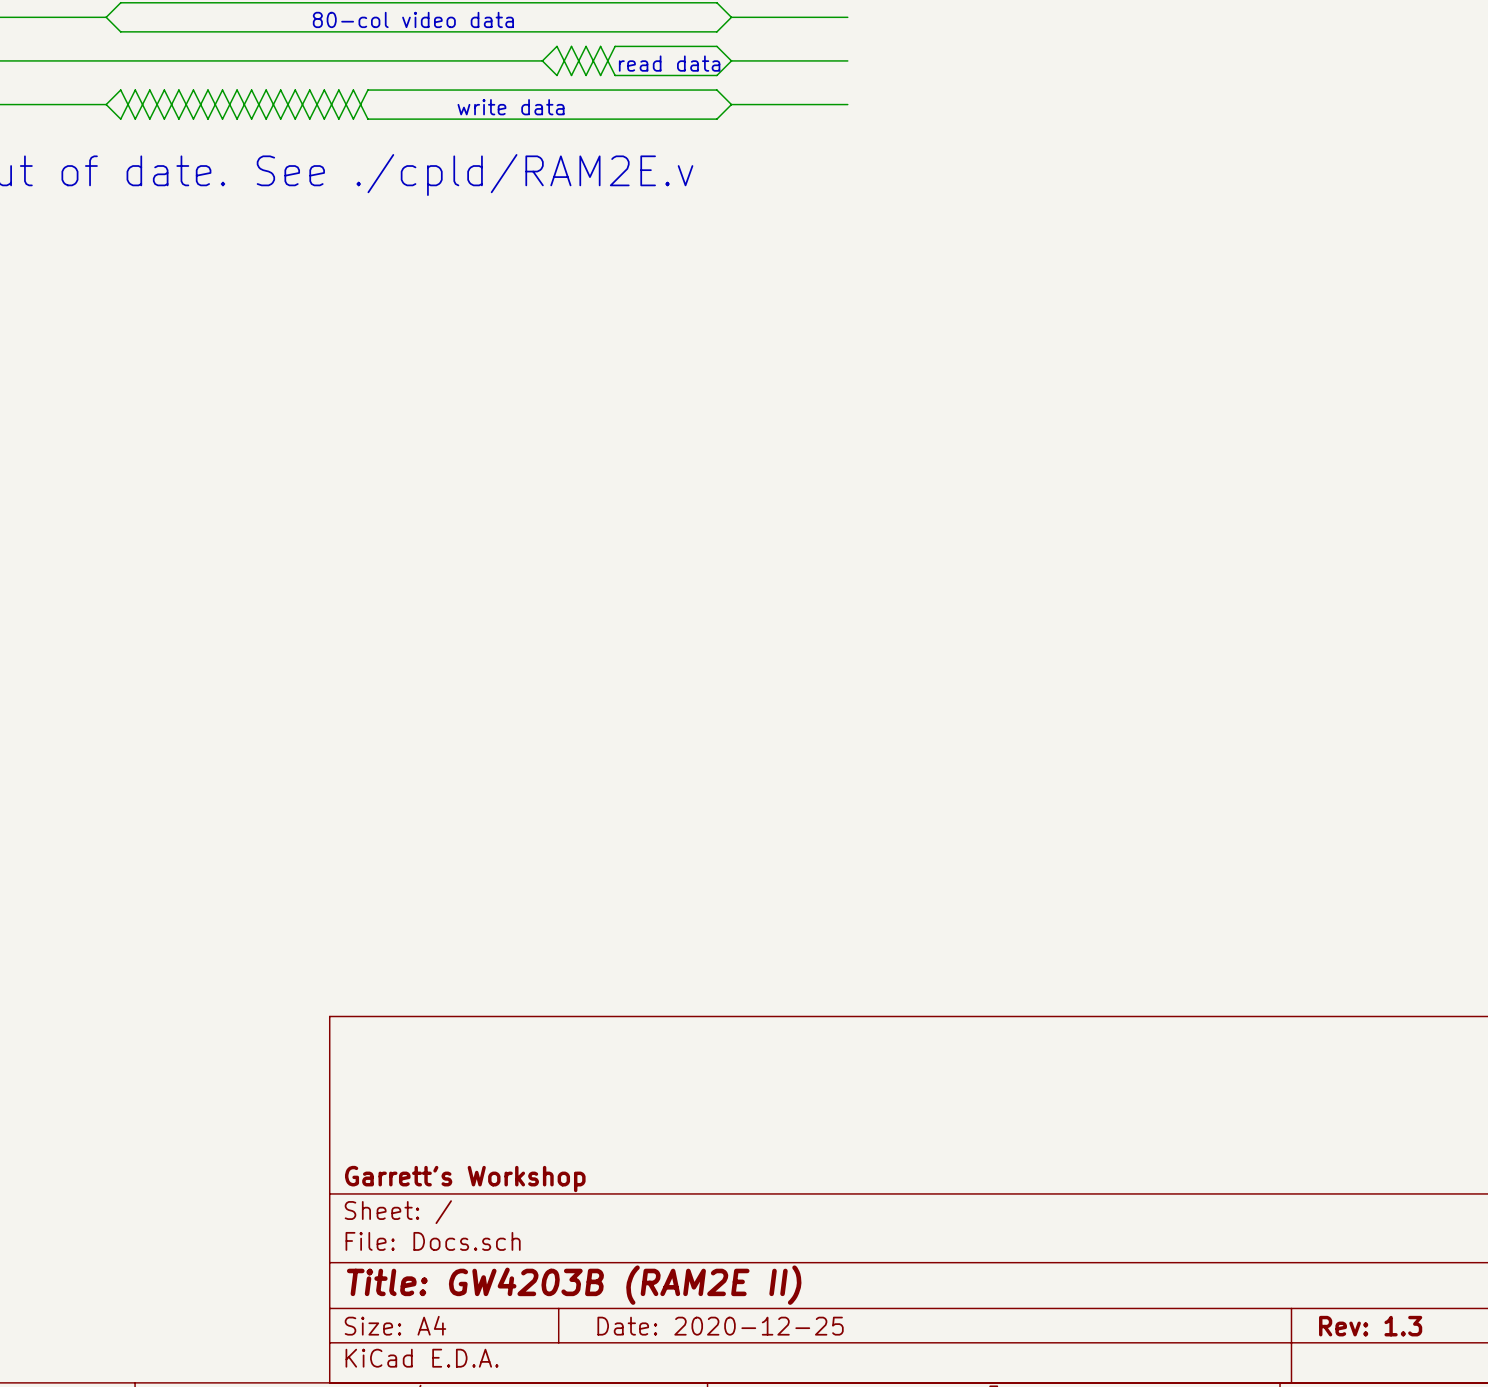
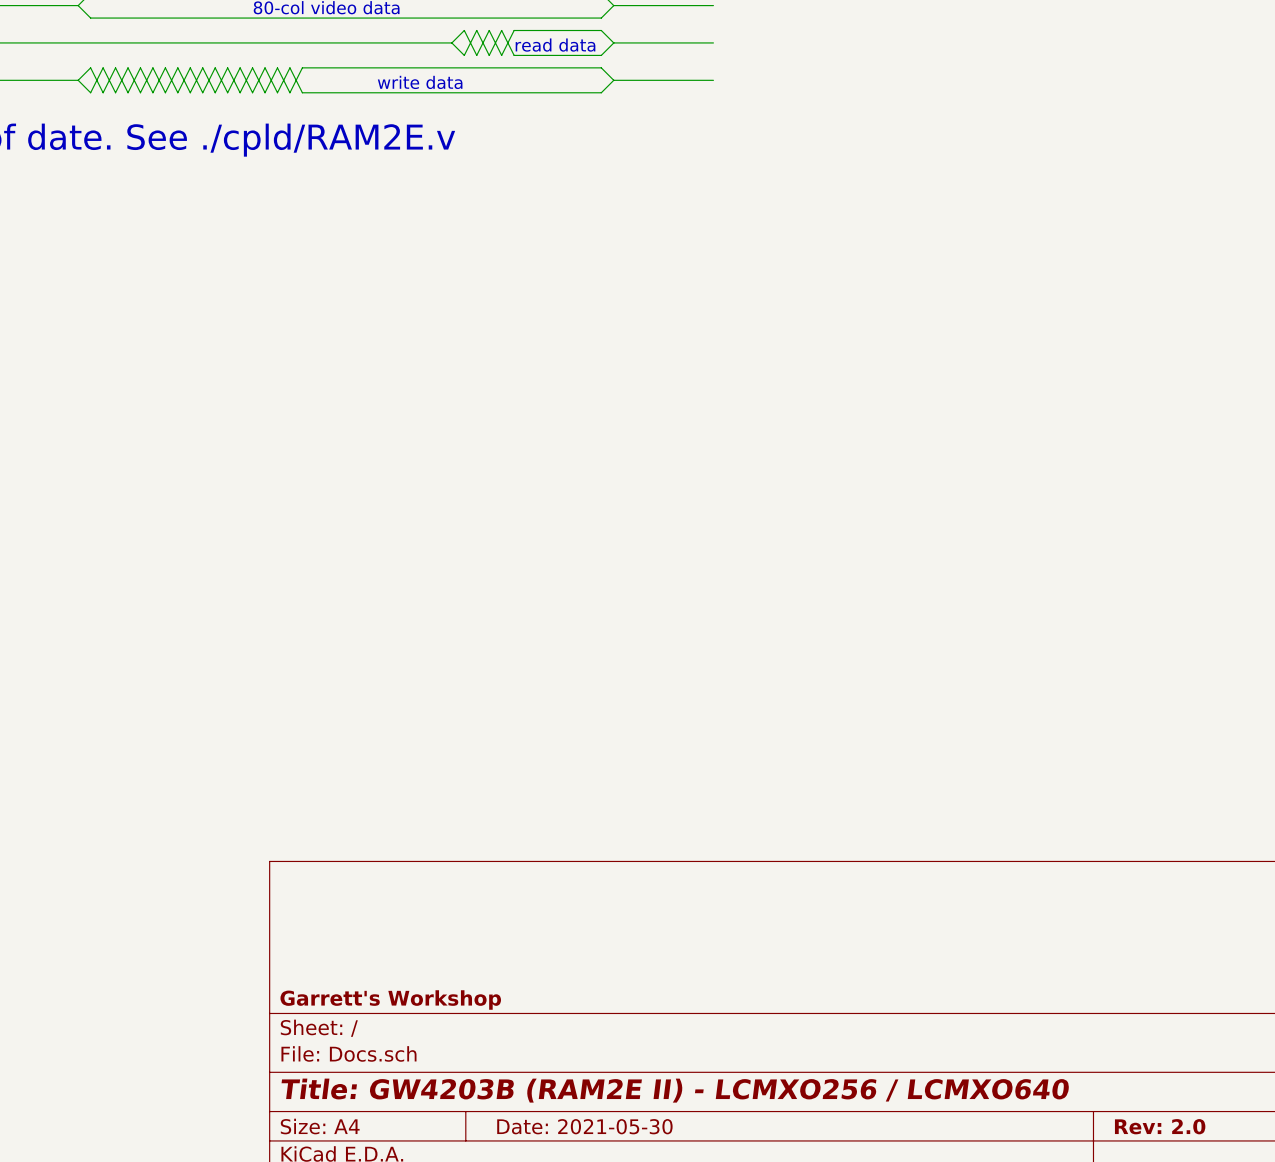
title block: Title: GW4203B (RAM2E II) (574, 1285) -> Title: GW4203B (RAM2E II) - LCMXO256 / LCMXO640 (675, 1090)
title block: Date: 2020-12-25 (720, 1326) -> Date: 2021-05-30 (584, 1126)
title block: Rev: 1.3 (1370, 1326) -> Rev: 2.0 (1160, 1126)

